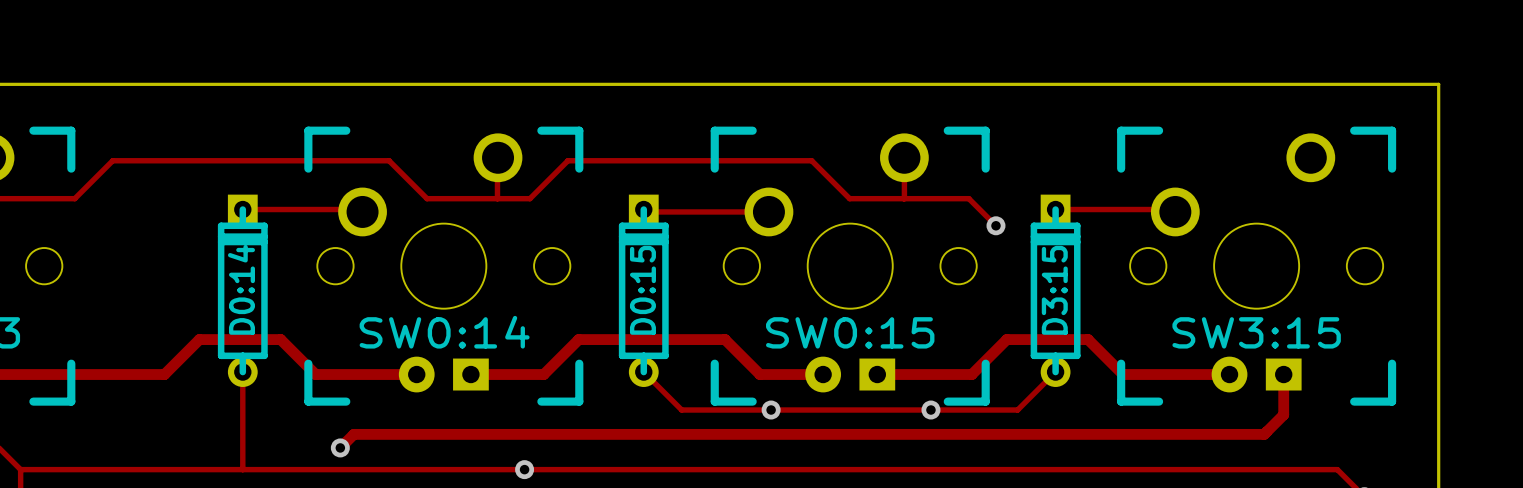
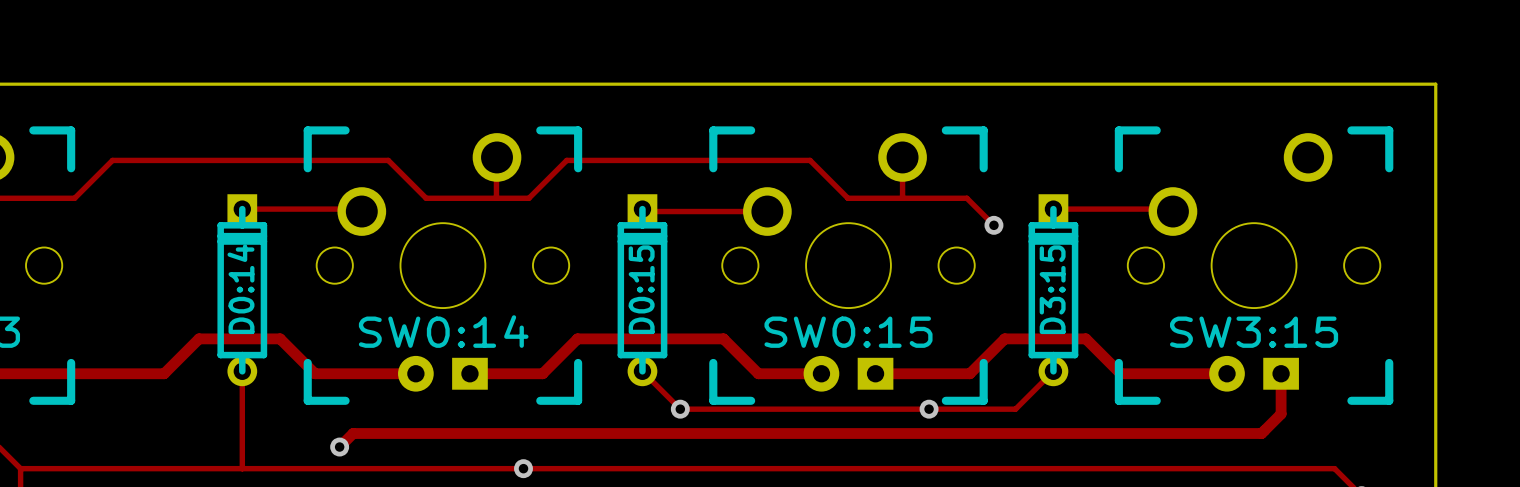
via position: (771, 410) -> (680, 409)

